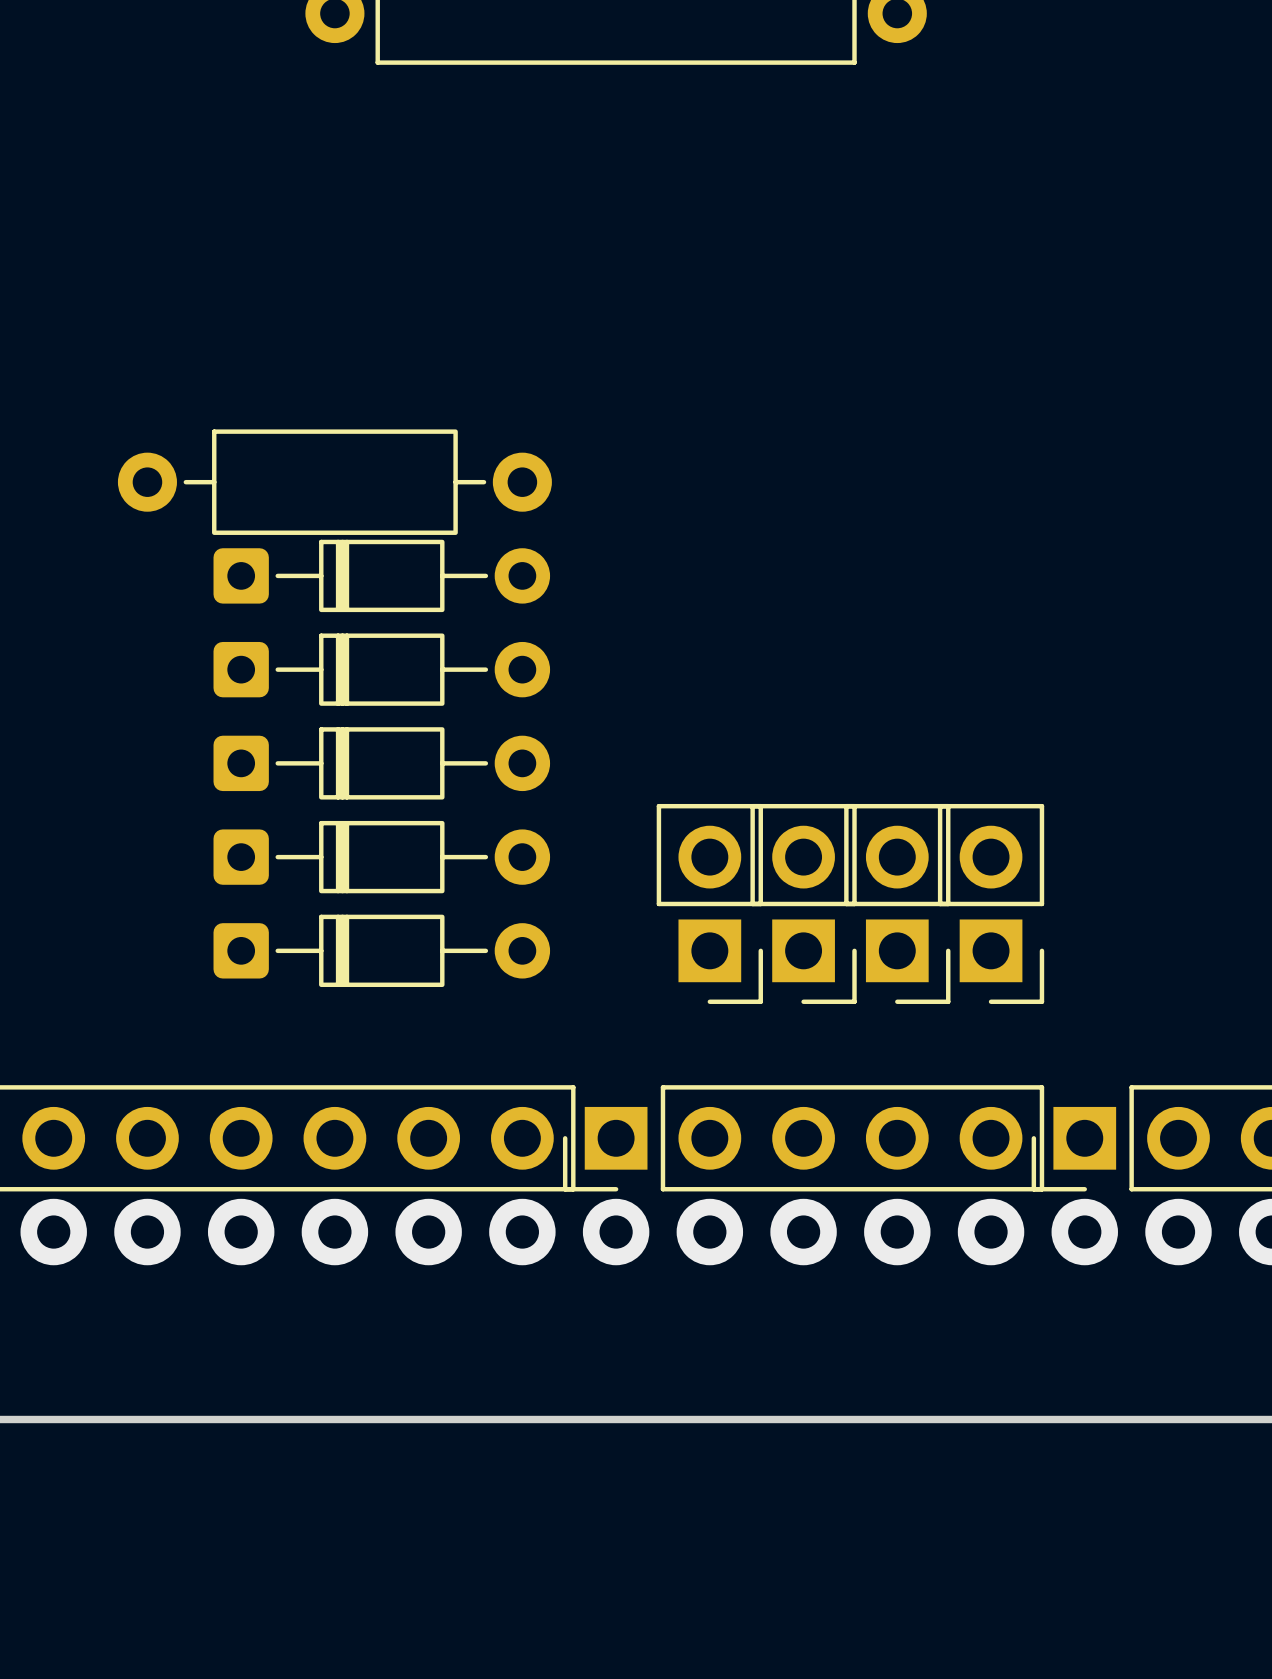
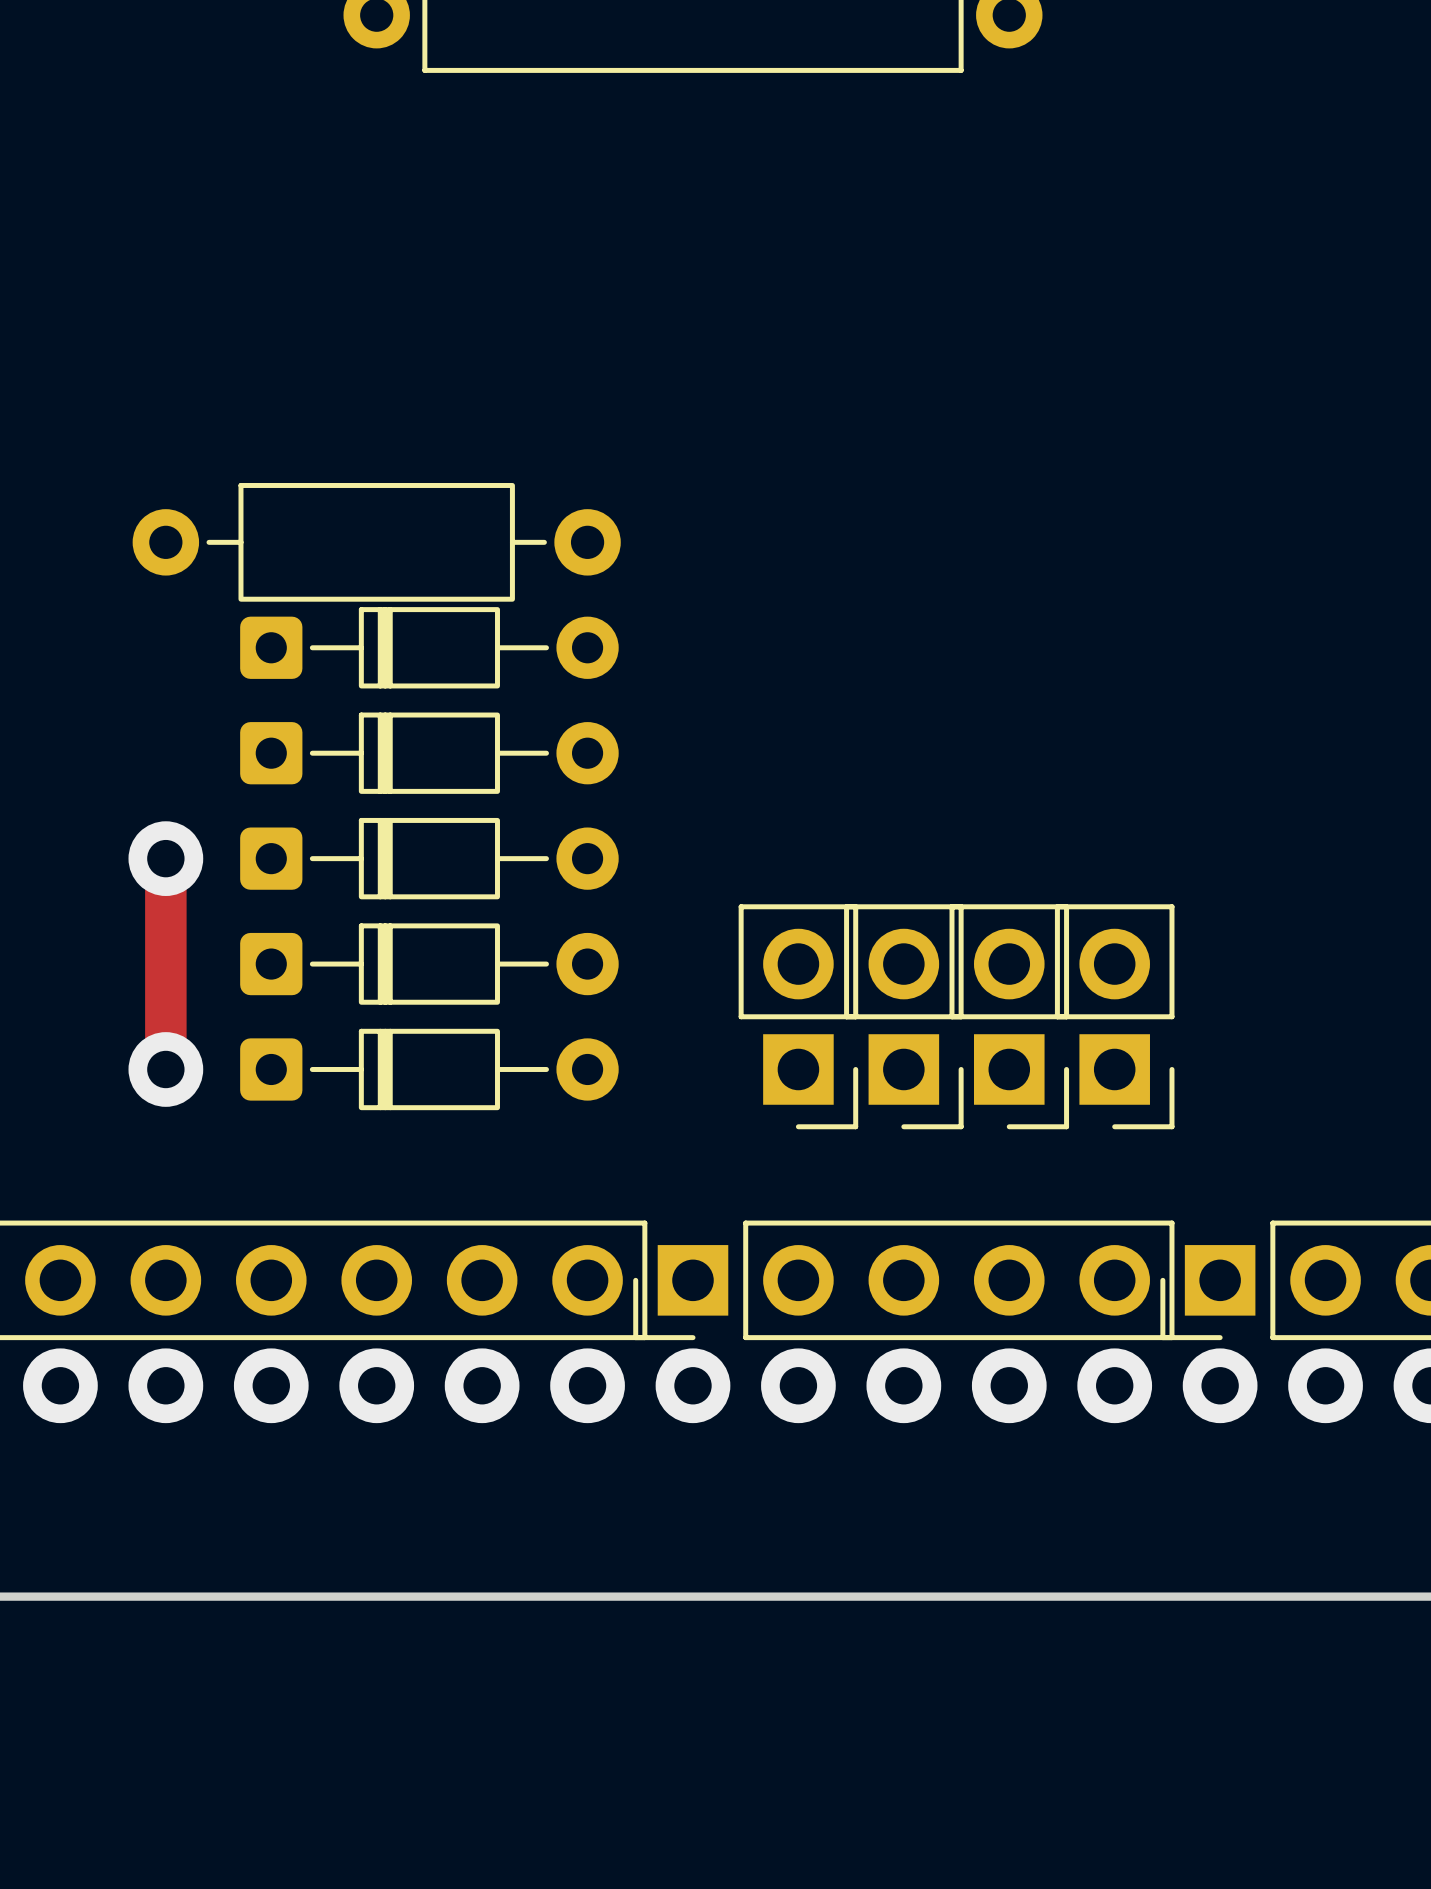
track: none -> (165, 858) (165, 1069)
via: none -> (165, 858)
via: none -> (165, 1069)

